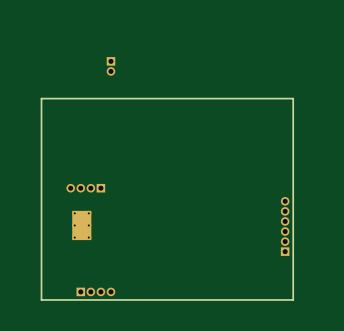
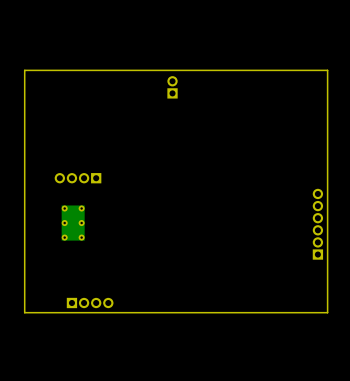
part rotation: 0° (110, 66) -> 180° (172, 87)
part position: (110, 66) -> (172, 87)

